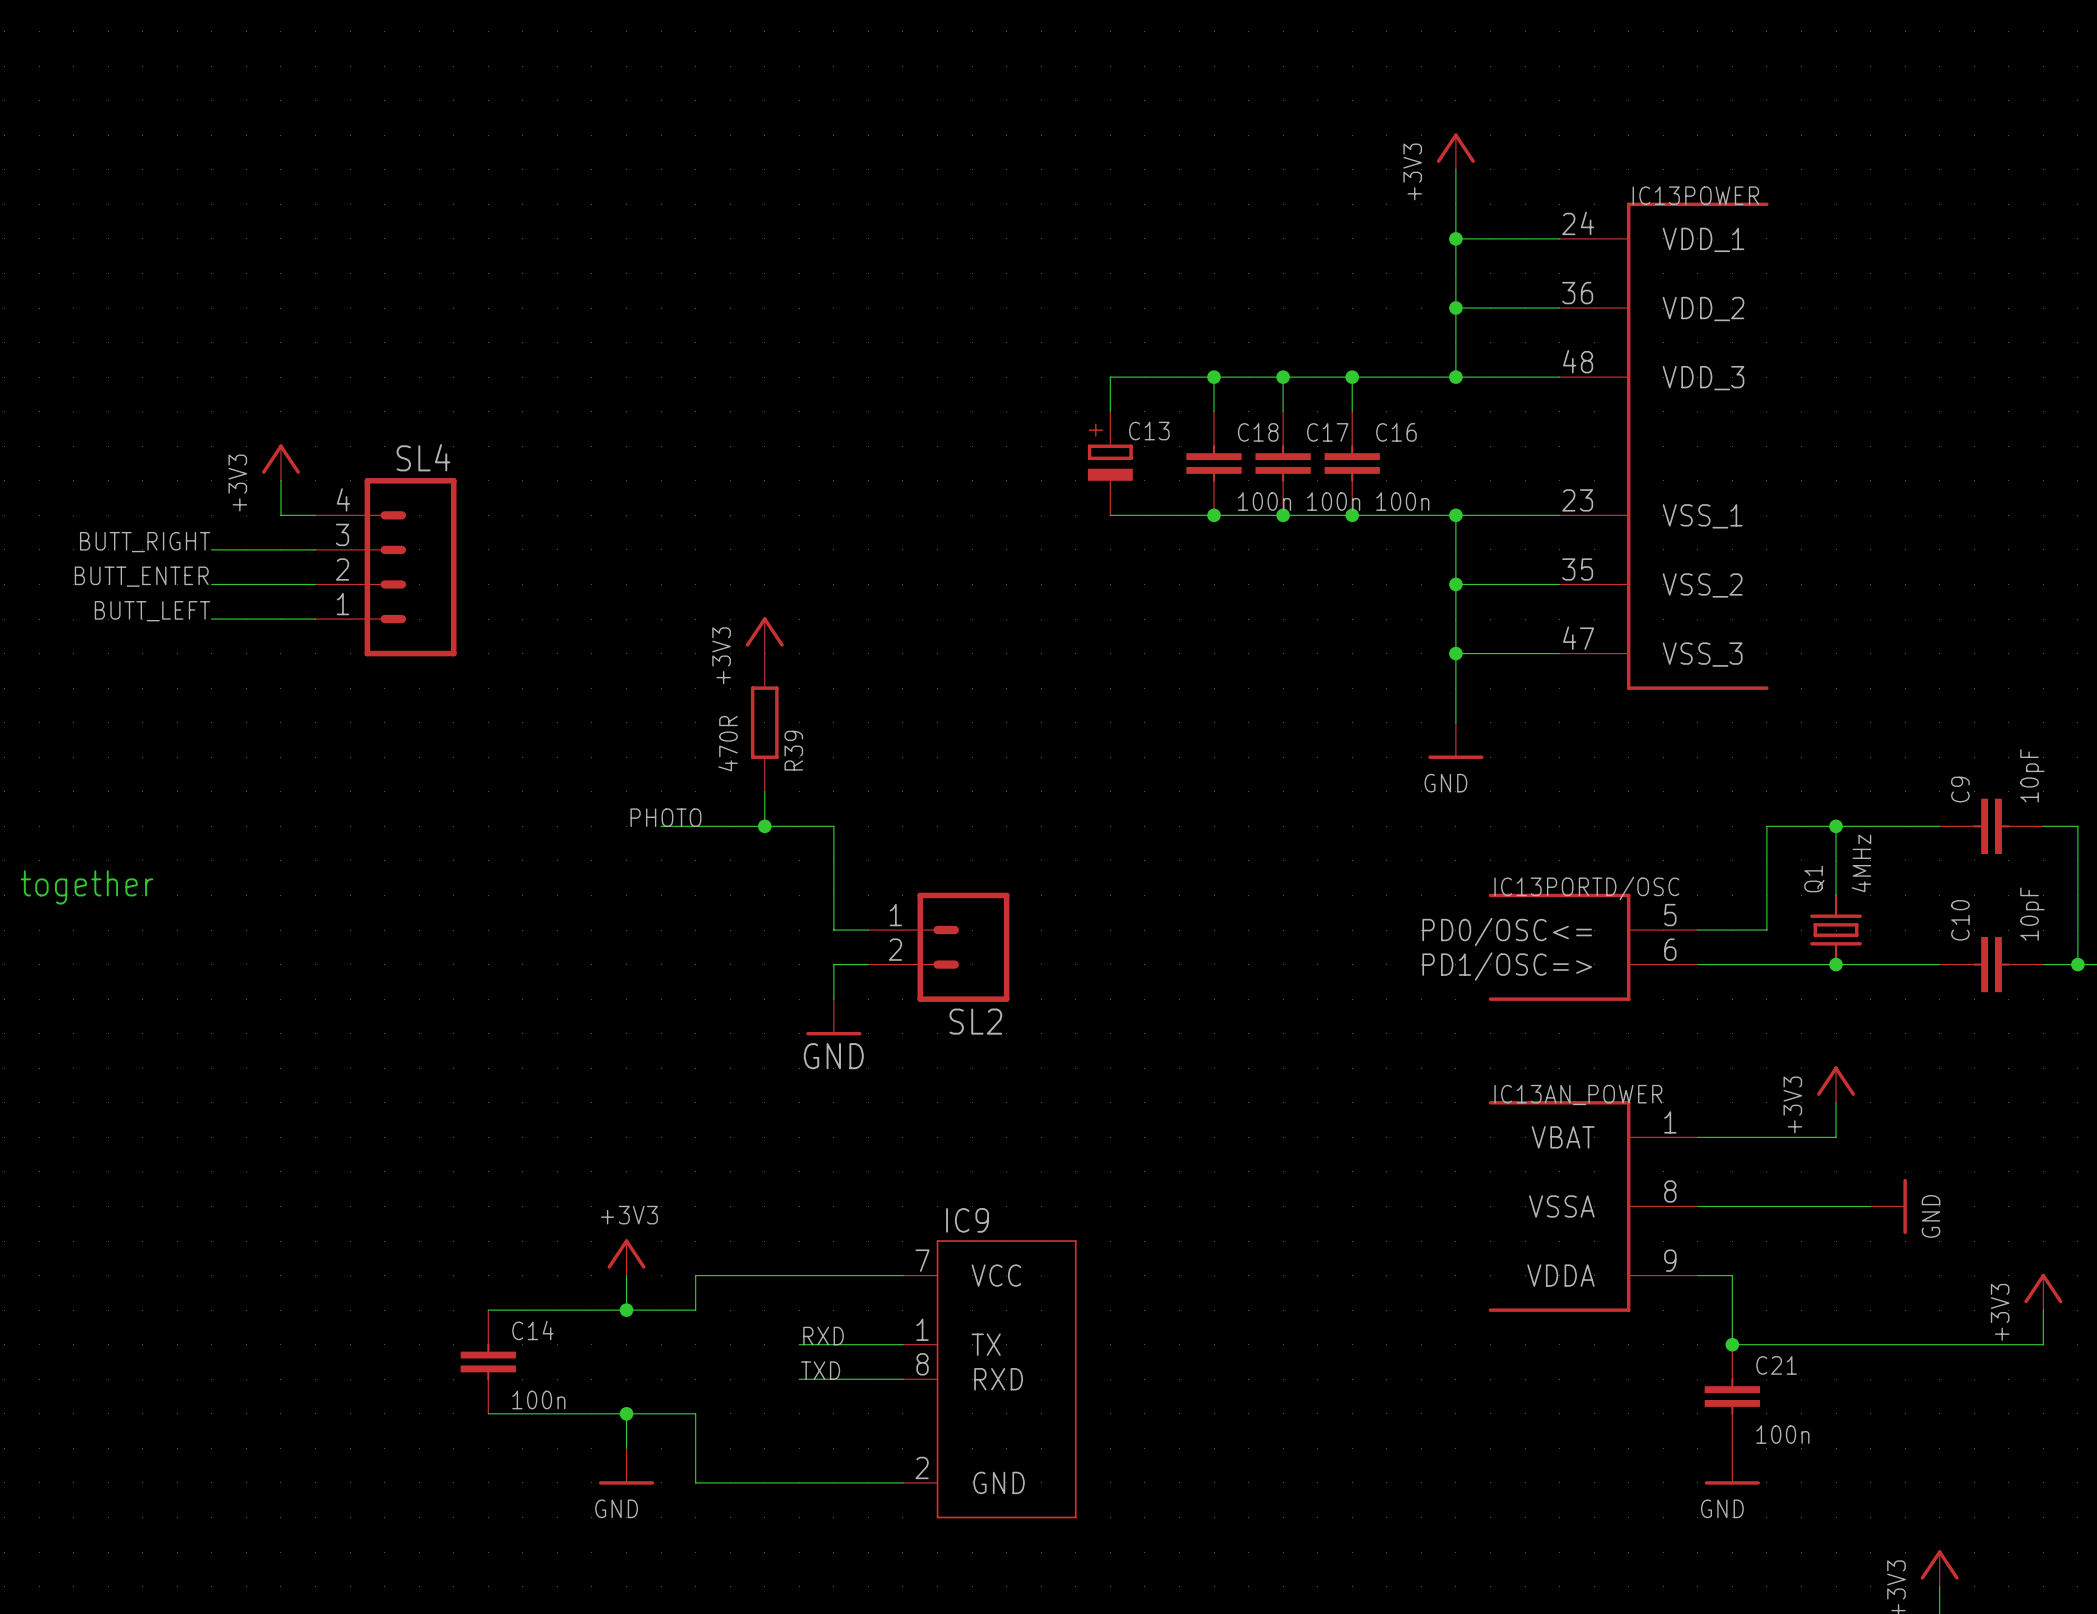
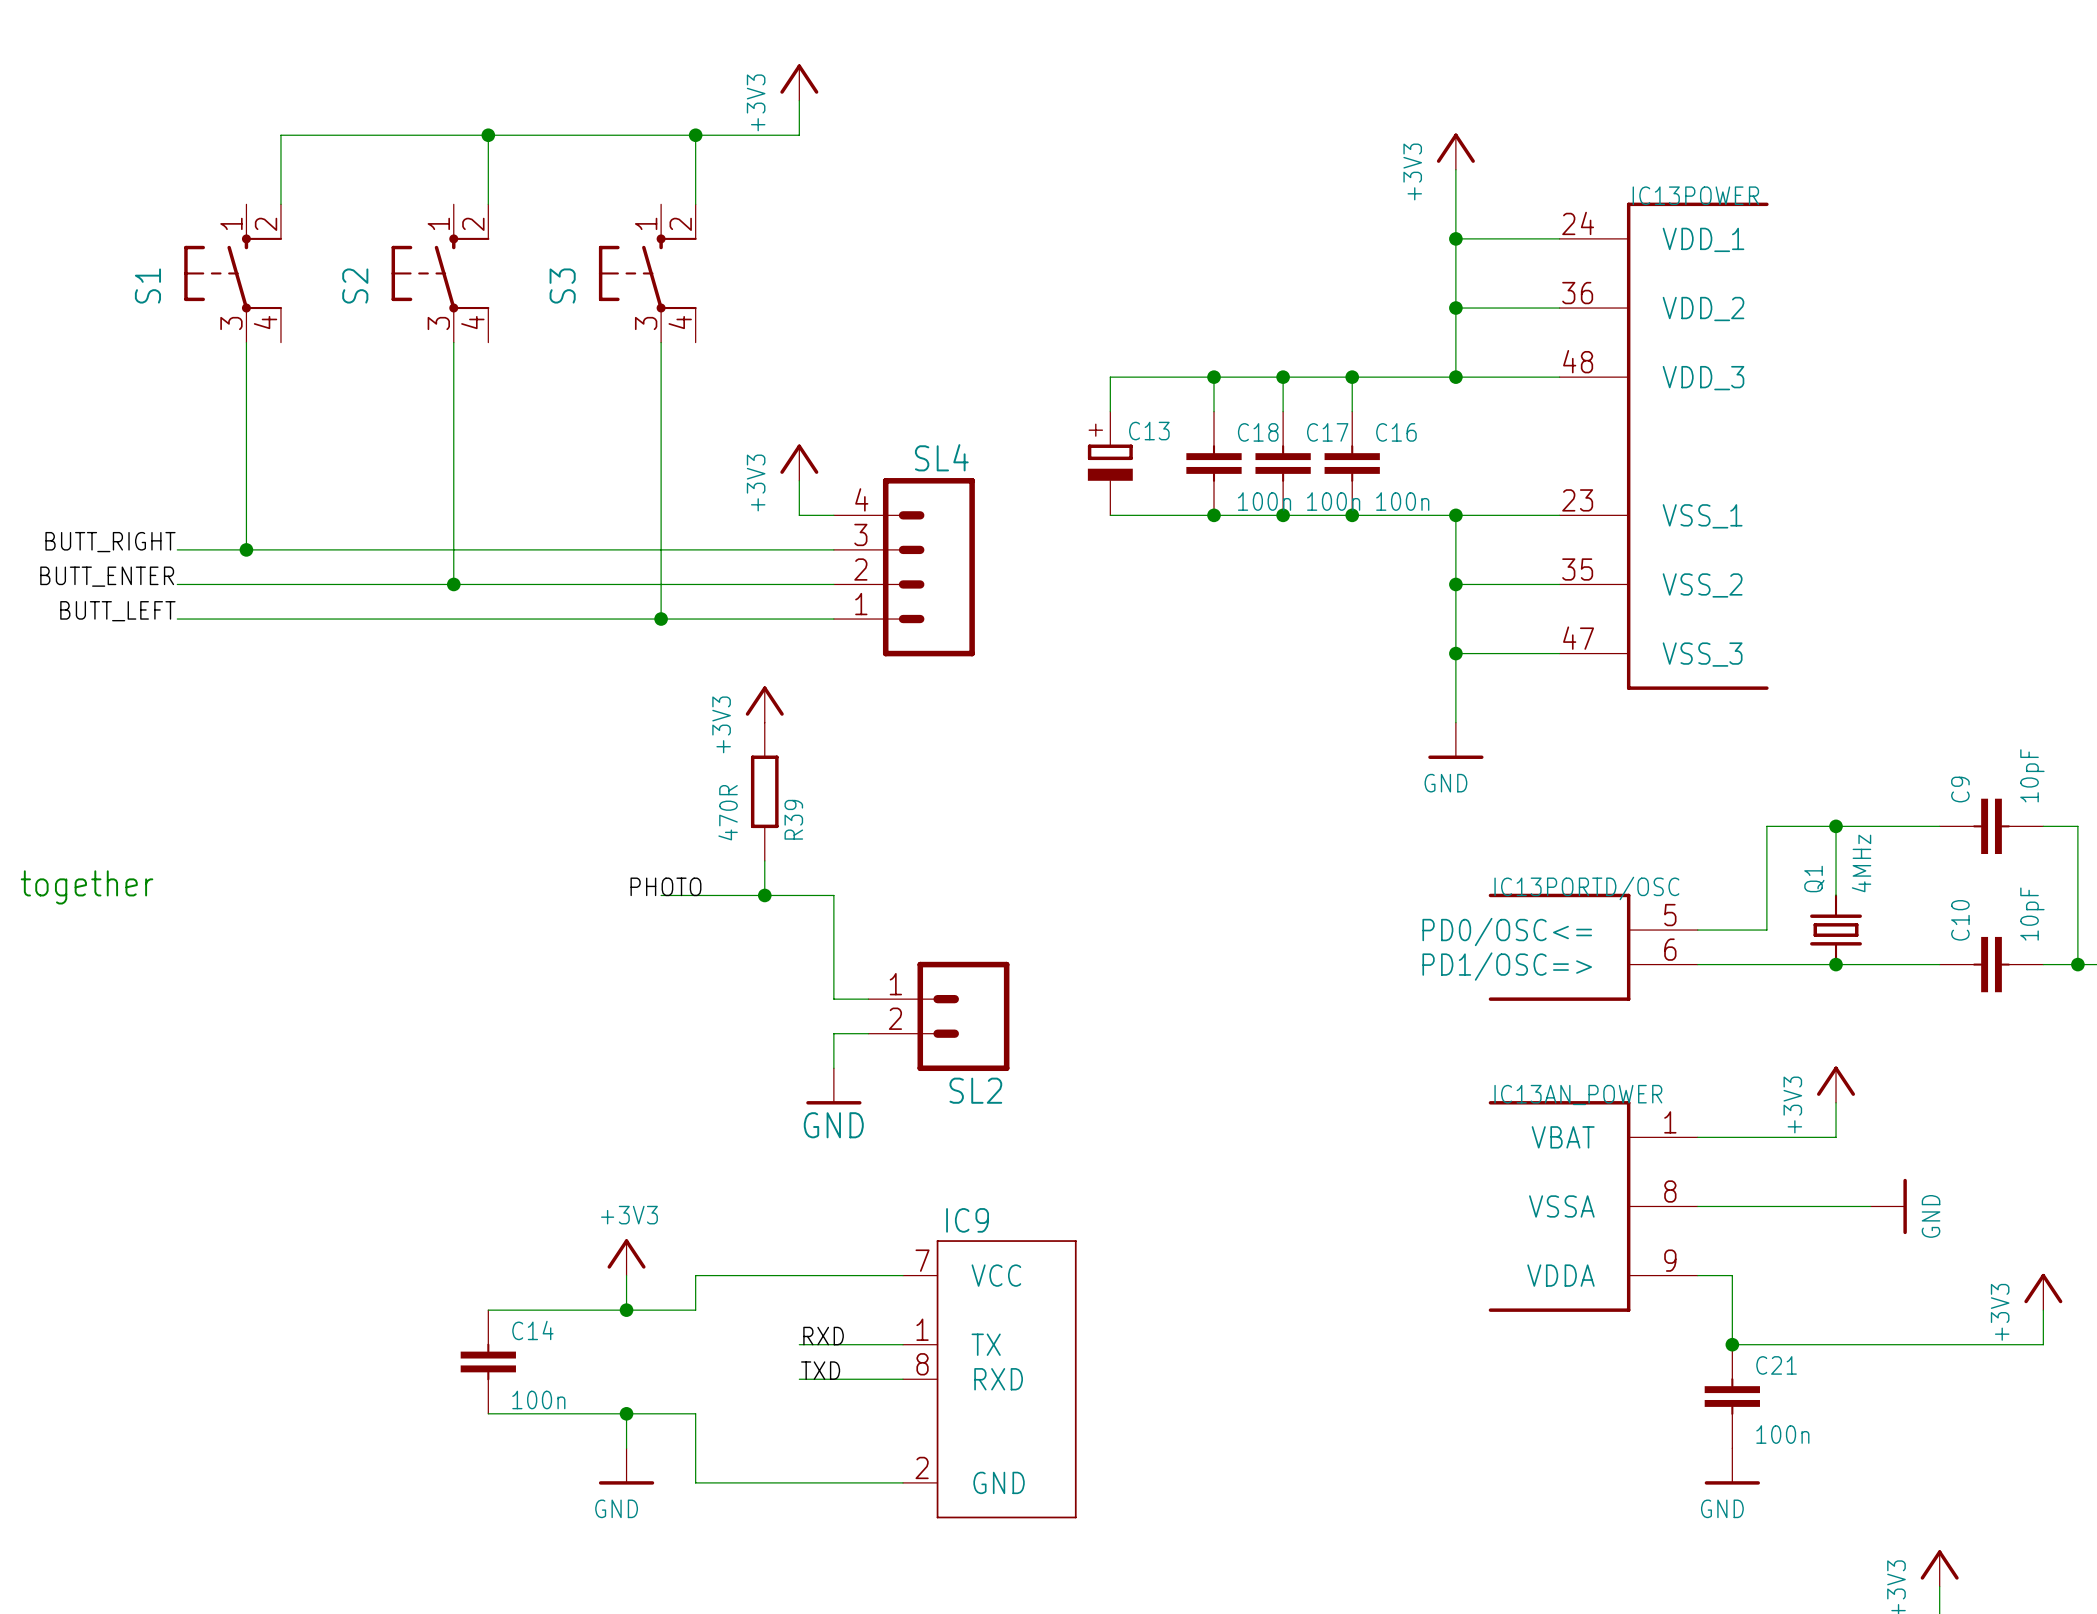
power symbol: none -> +3V3 (799, 82)
wire: none -> (799, 100) (799, 135) (280, 135) (280, 204)
wire: none -> (488, 135) (488, 204)
junction: none -> (488, 135)
wire: none -> (695, 135) (695, 204)
junction: none -> (695, 135)
S1: none -> (233, 273)
S2: none -> (440, 273)
S3: none -> (647, 273)
wire: none -> (246, 342) (246, 549)
wire: none -> (453, 342) (453, 584)
wire: none -> (661, 342) (661, 619)
power symbol: +3V3 (280, 462) -> none
power symbol: none -> +3V3 (799, 462)
wire: (280, 480) (280, 515) (315, 515) -> none
wire: none -> (799, 480) (799, 515) (833, 515)
label position: BUTT_RIGHT (145, 542) -> BUTT_RIGHT (110, 542)
wire: none -> (177, 549) (211, 549)
junction: none -> (246, 549)
wire: none -> (315, 549) (833, 549)
SL4 position: (386, 567) -> (904, 567)
label position: BUTT_ENTER (141, 576) -> BUTT_ENTER (107, 576)
wire: none -> (177, 584) (211, 584)
wire: none -> (315, 584) (833, 584)
junction: none -> (453, 584)
label position: BUTT_LEFT (152, 611) -> BUTT_LEFT (117, 611)
wire: none -> (177, 619) (211, 619)
wire: none -> (315, 619) (833, 619)
junction: none -> (661, 619)
power symbol position: +3V3 (764, 635) -> +3V3 (764, 704)
R39 position: (764, 722) -> (764, 791)
wire: (764, 791) (764, 826) -> (764, 860) (764, 895)
label position: PHOTO (665, 817) -> PHOTO (665, 886)
wire: (661, 826) (833, 826) (833, 895) -> (661, 895) (833, 895)
junction position: (764, 826) -> (764, 895)
wire: (833, 930) (868, 930) -> (833, 930) (833, 964)
SL2 position: (938, 947) -> (938, 1016)
wire: (833, 964) (868, 964) -> (833, 999) (868, 999)
power symbol position: GND (833, 1017) -> GND (833, 1086)
wire: none -> (868, 1033) (833, 1033) (833, 1068)

